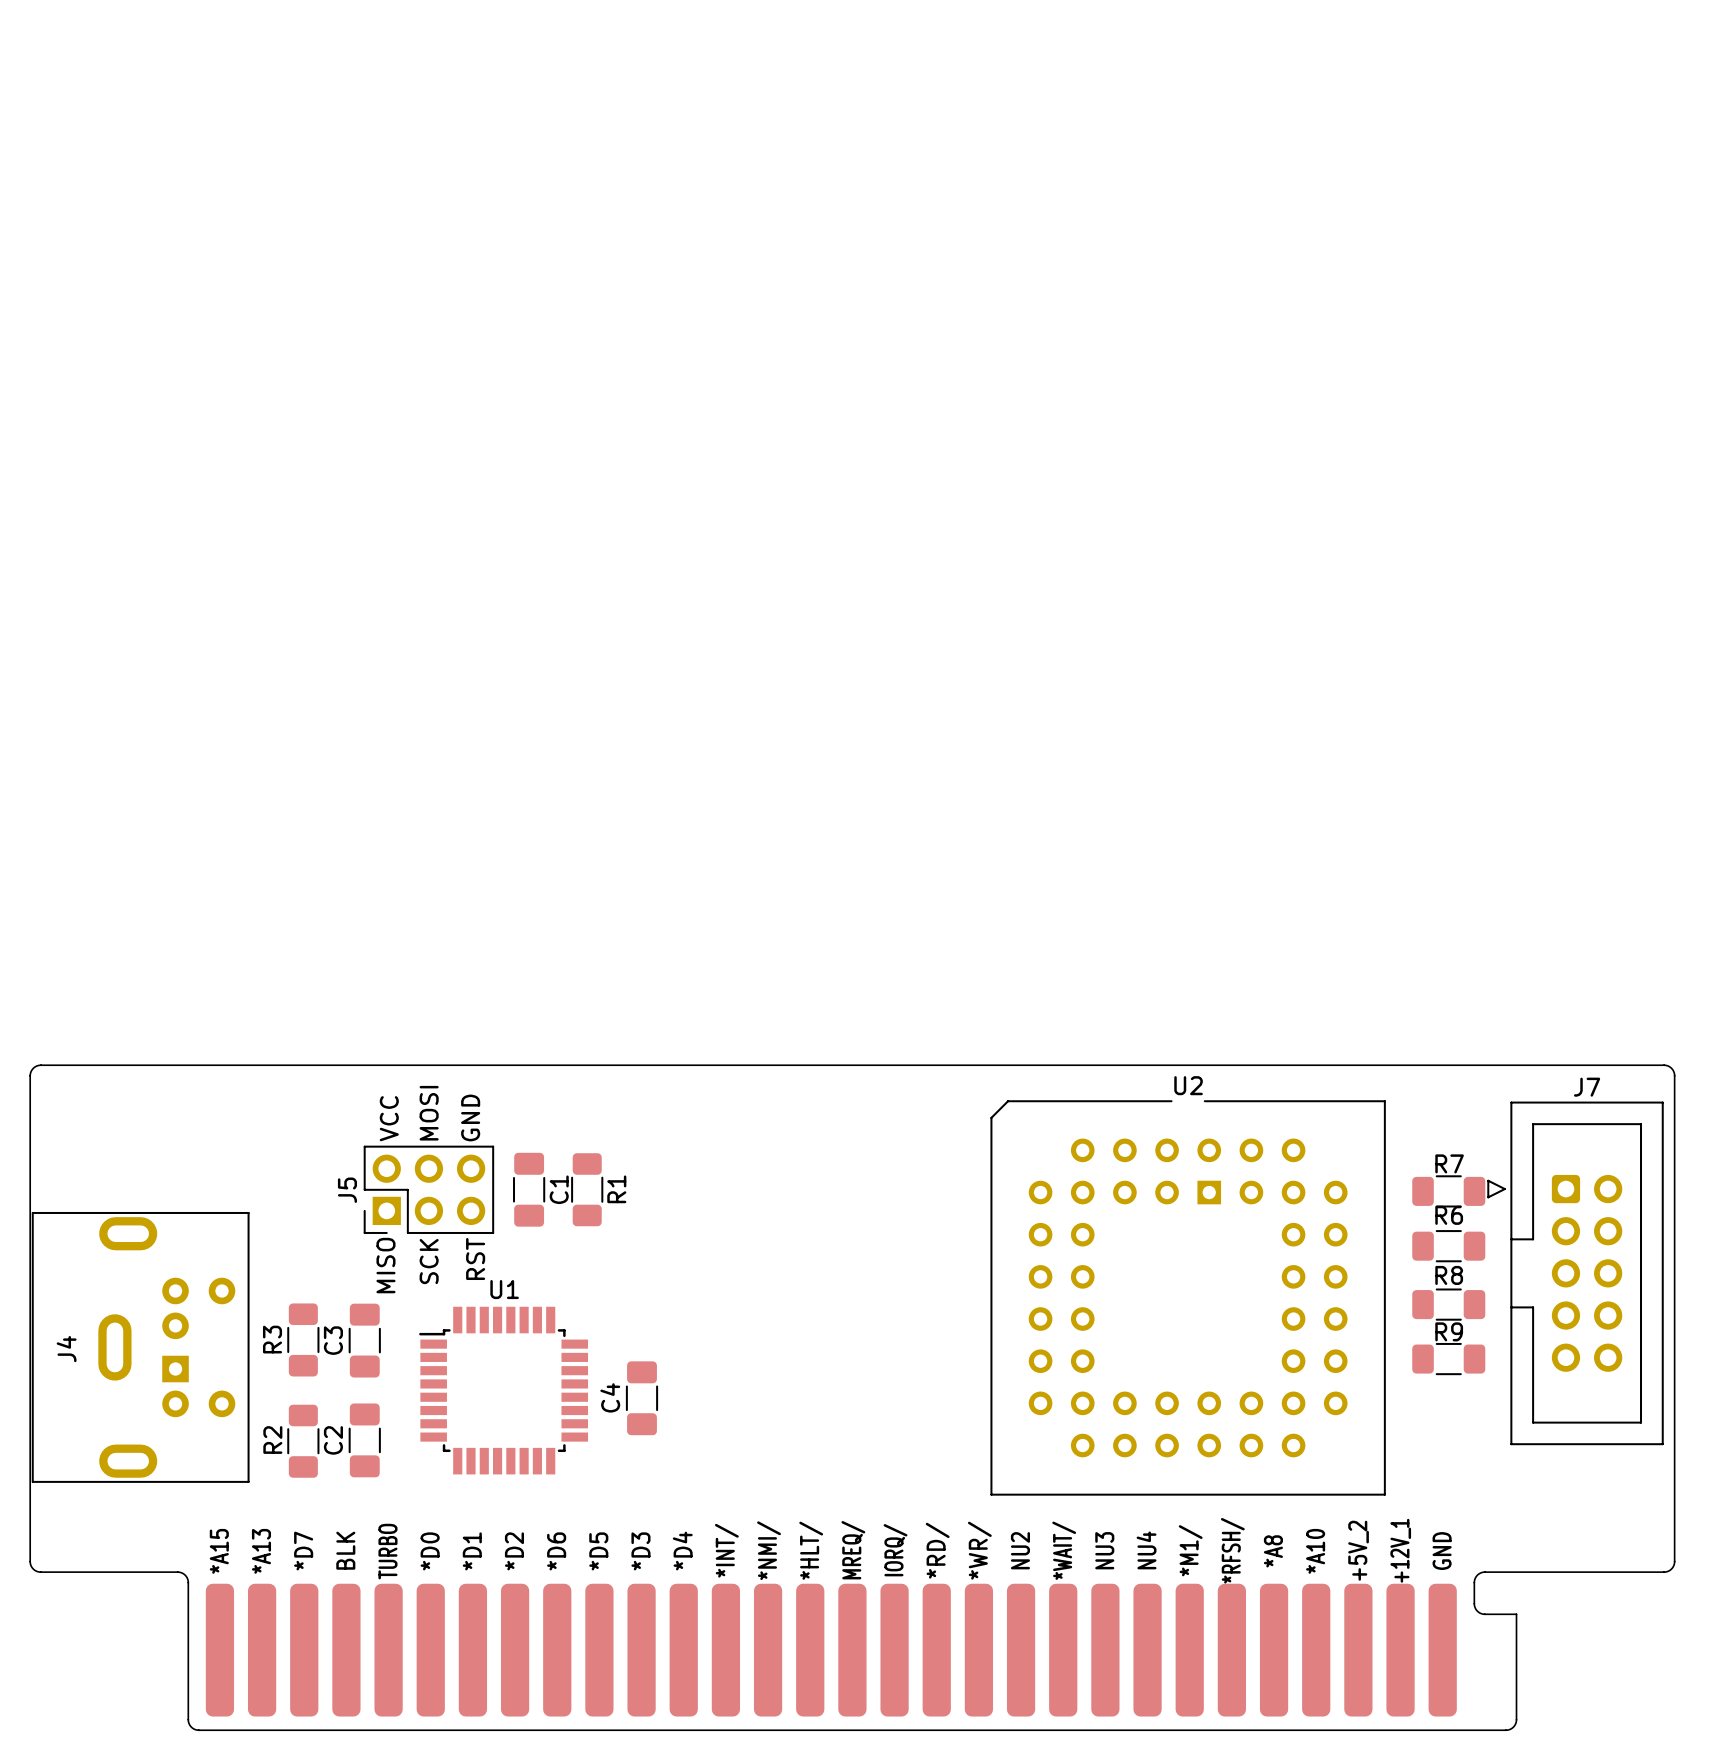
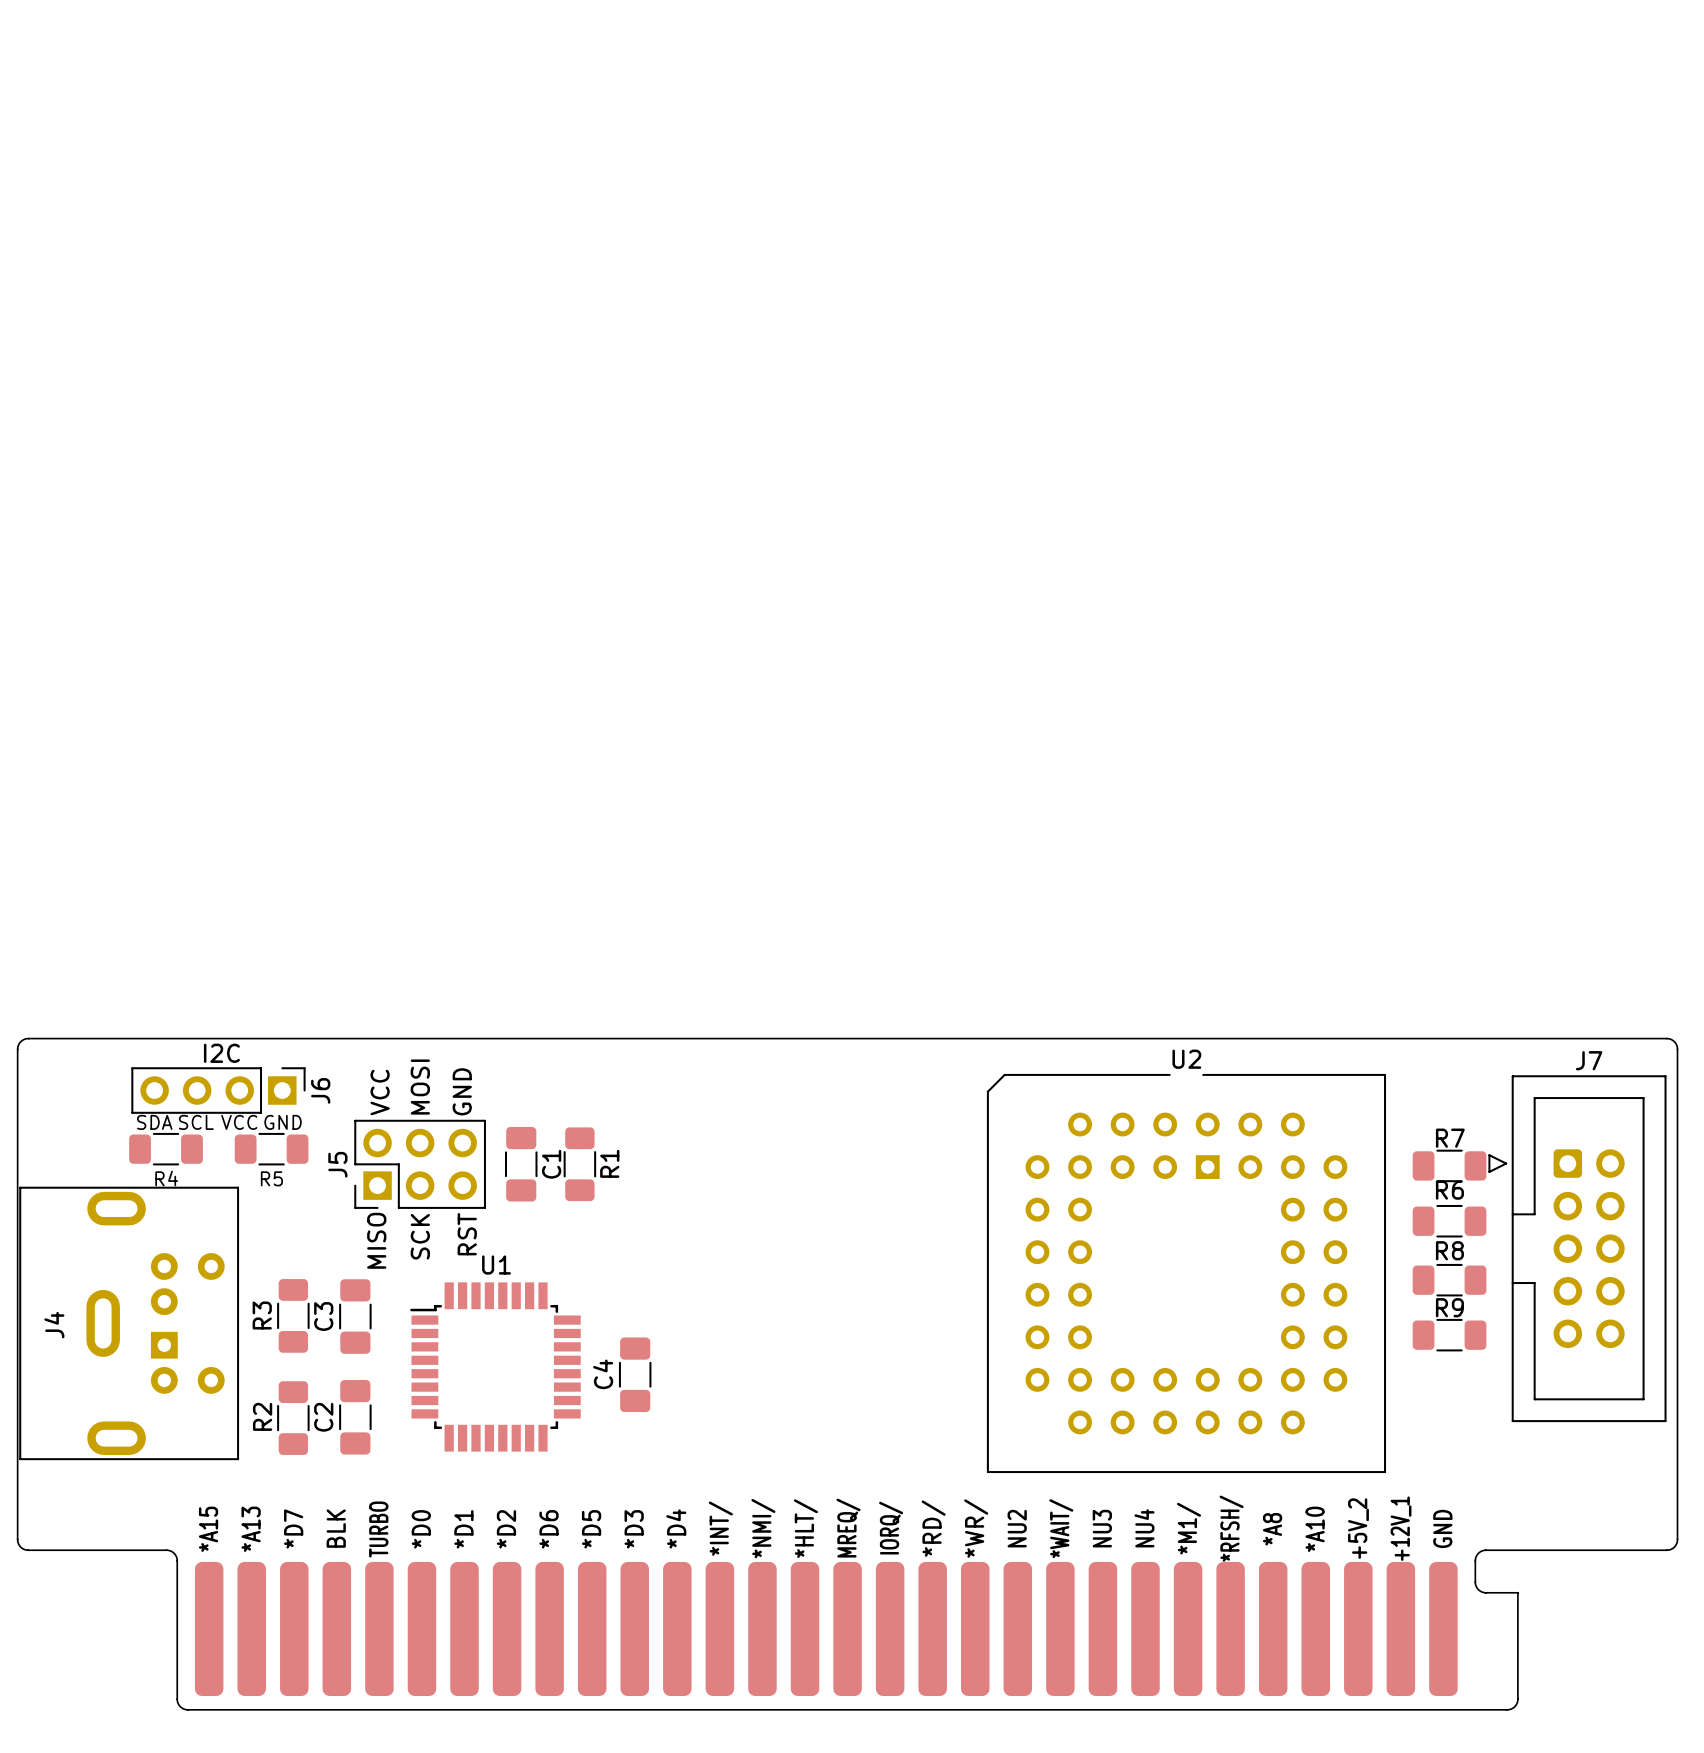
text: none -> I2C (221, 1053)
J6: none -> (218, 1090)
text: none -> SDA (154, 1122)
text: none -> SCL (196, 1122)
text: none -> VCC (239, 1122)
text: none -> GND (283, 1122)
R4: none -> (166, 1149)
R5: none -> (271, 1149)

